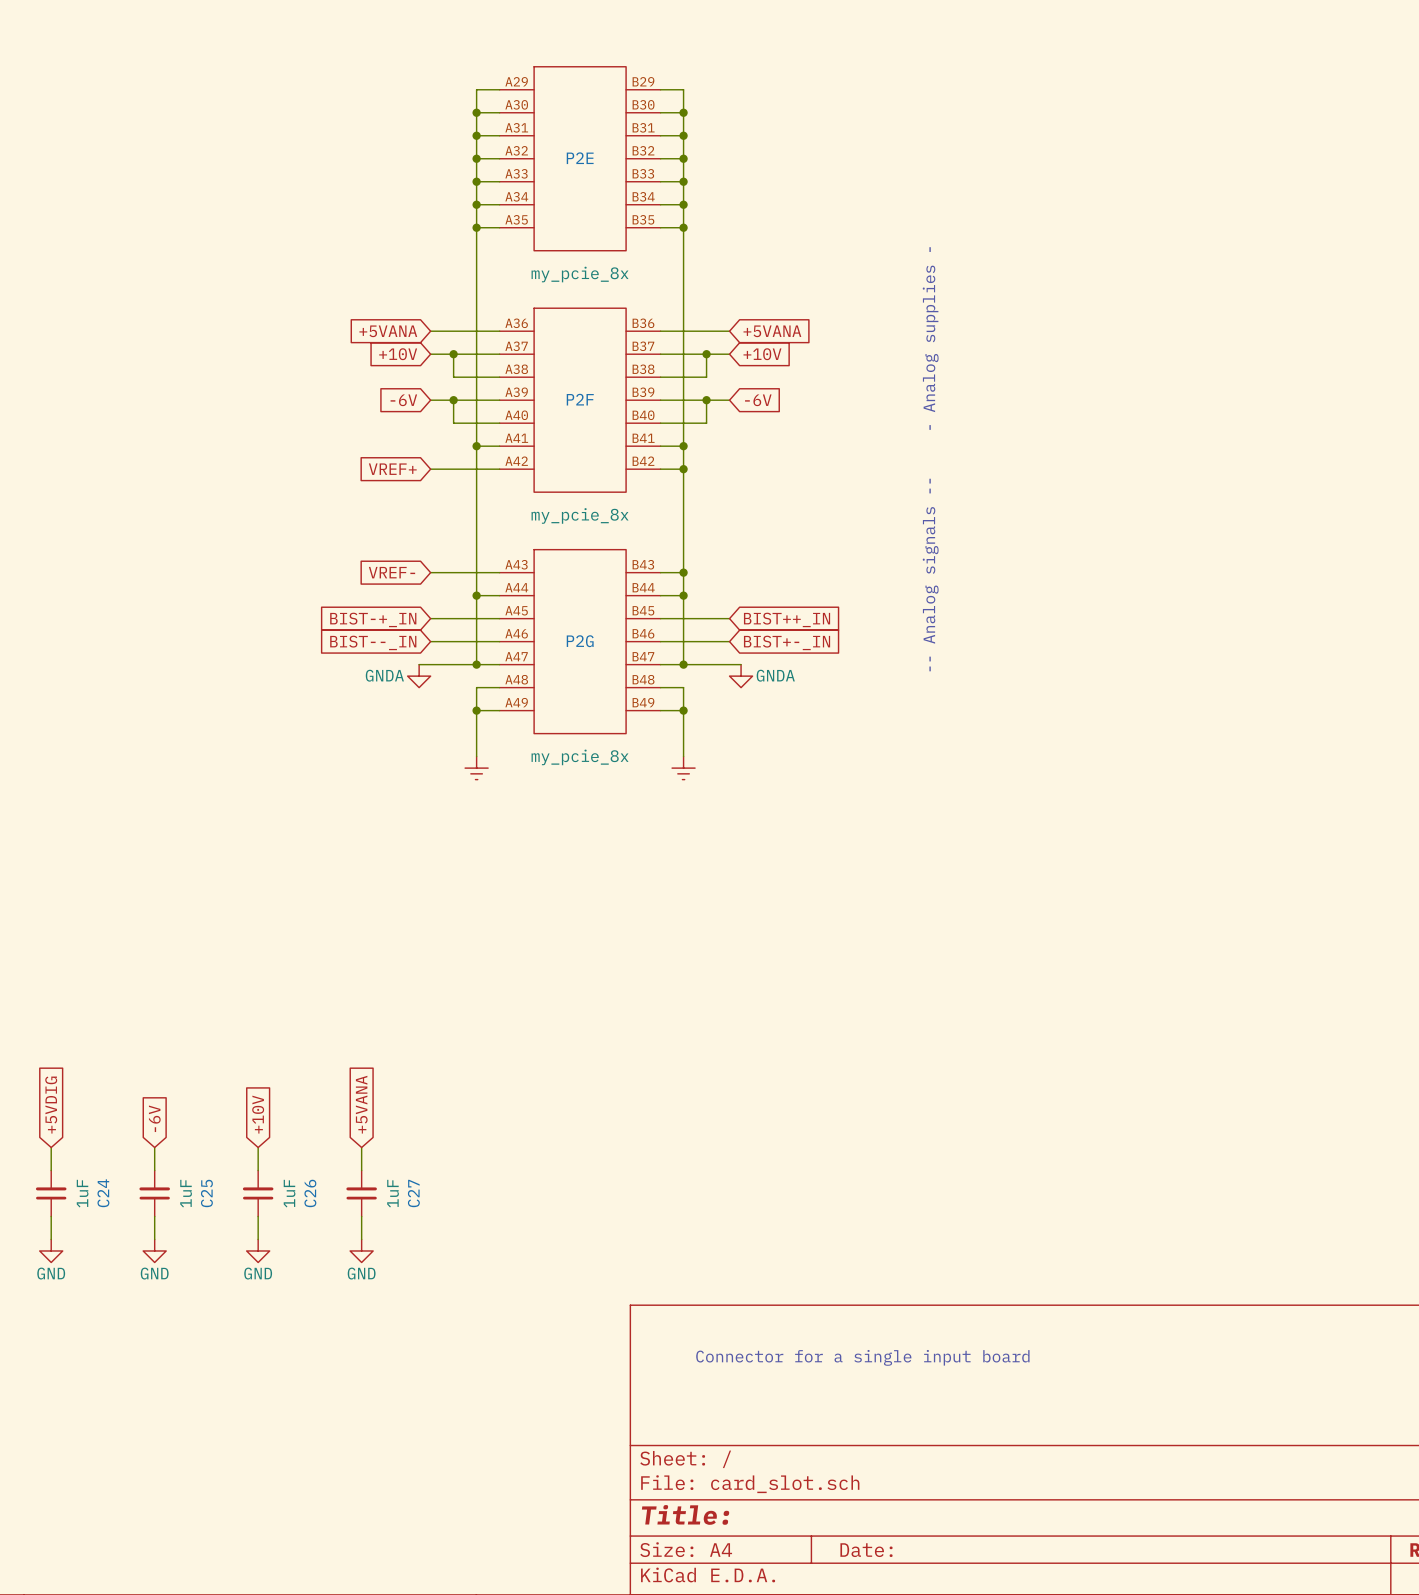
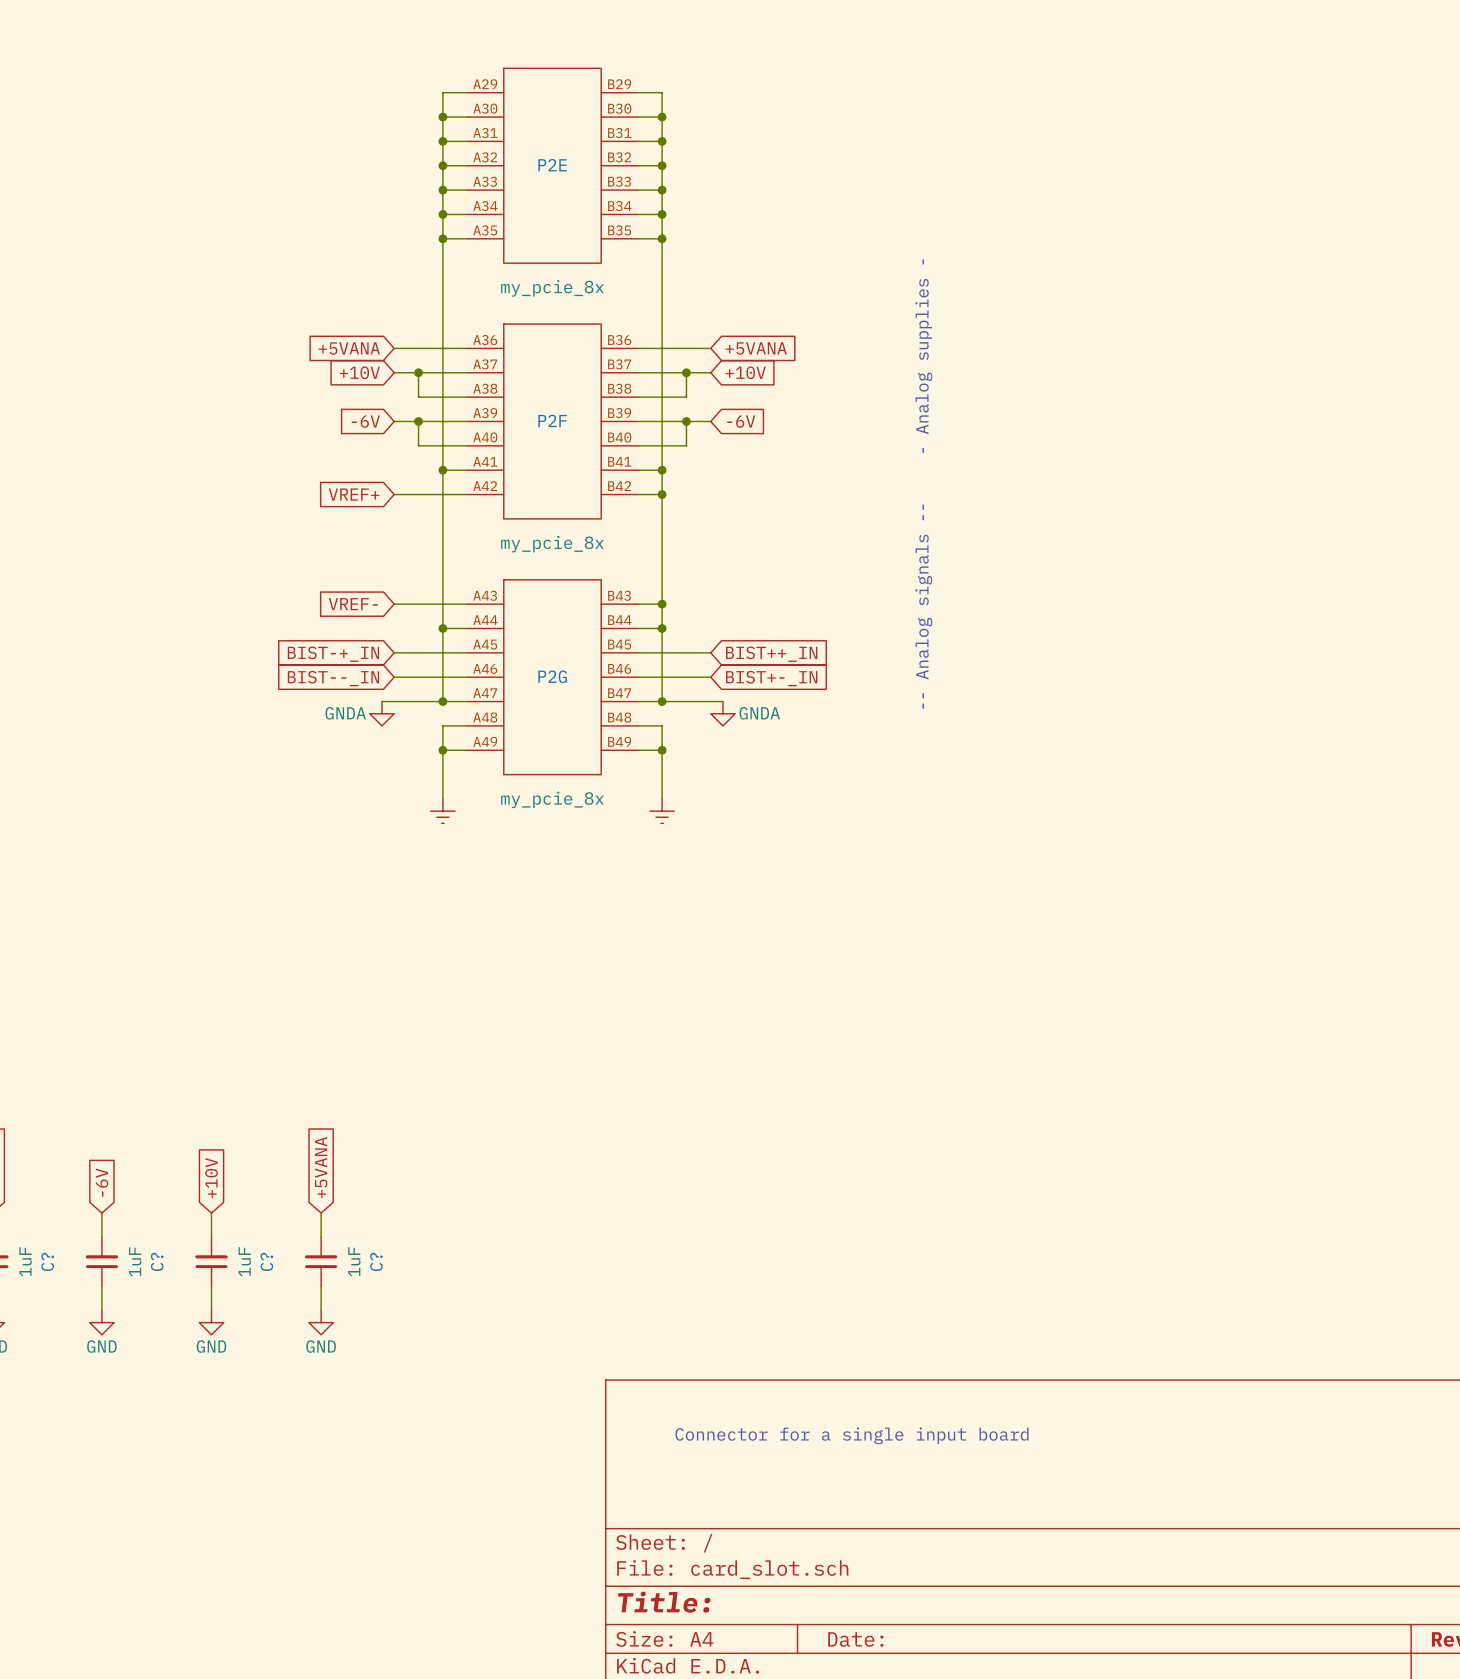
C24 name: C24 (103, 1193) -> C? (47, 1261)
C25 name: C25 (206, 1193) -> C? (157, 1261)
C26 name: C26 (310, 1193) -> C? (266, 1261)
C27 name: C27 (413, 1193) -> C? (376, 1261)

